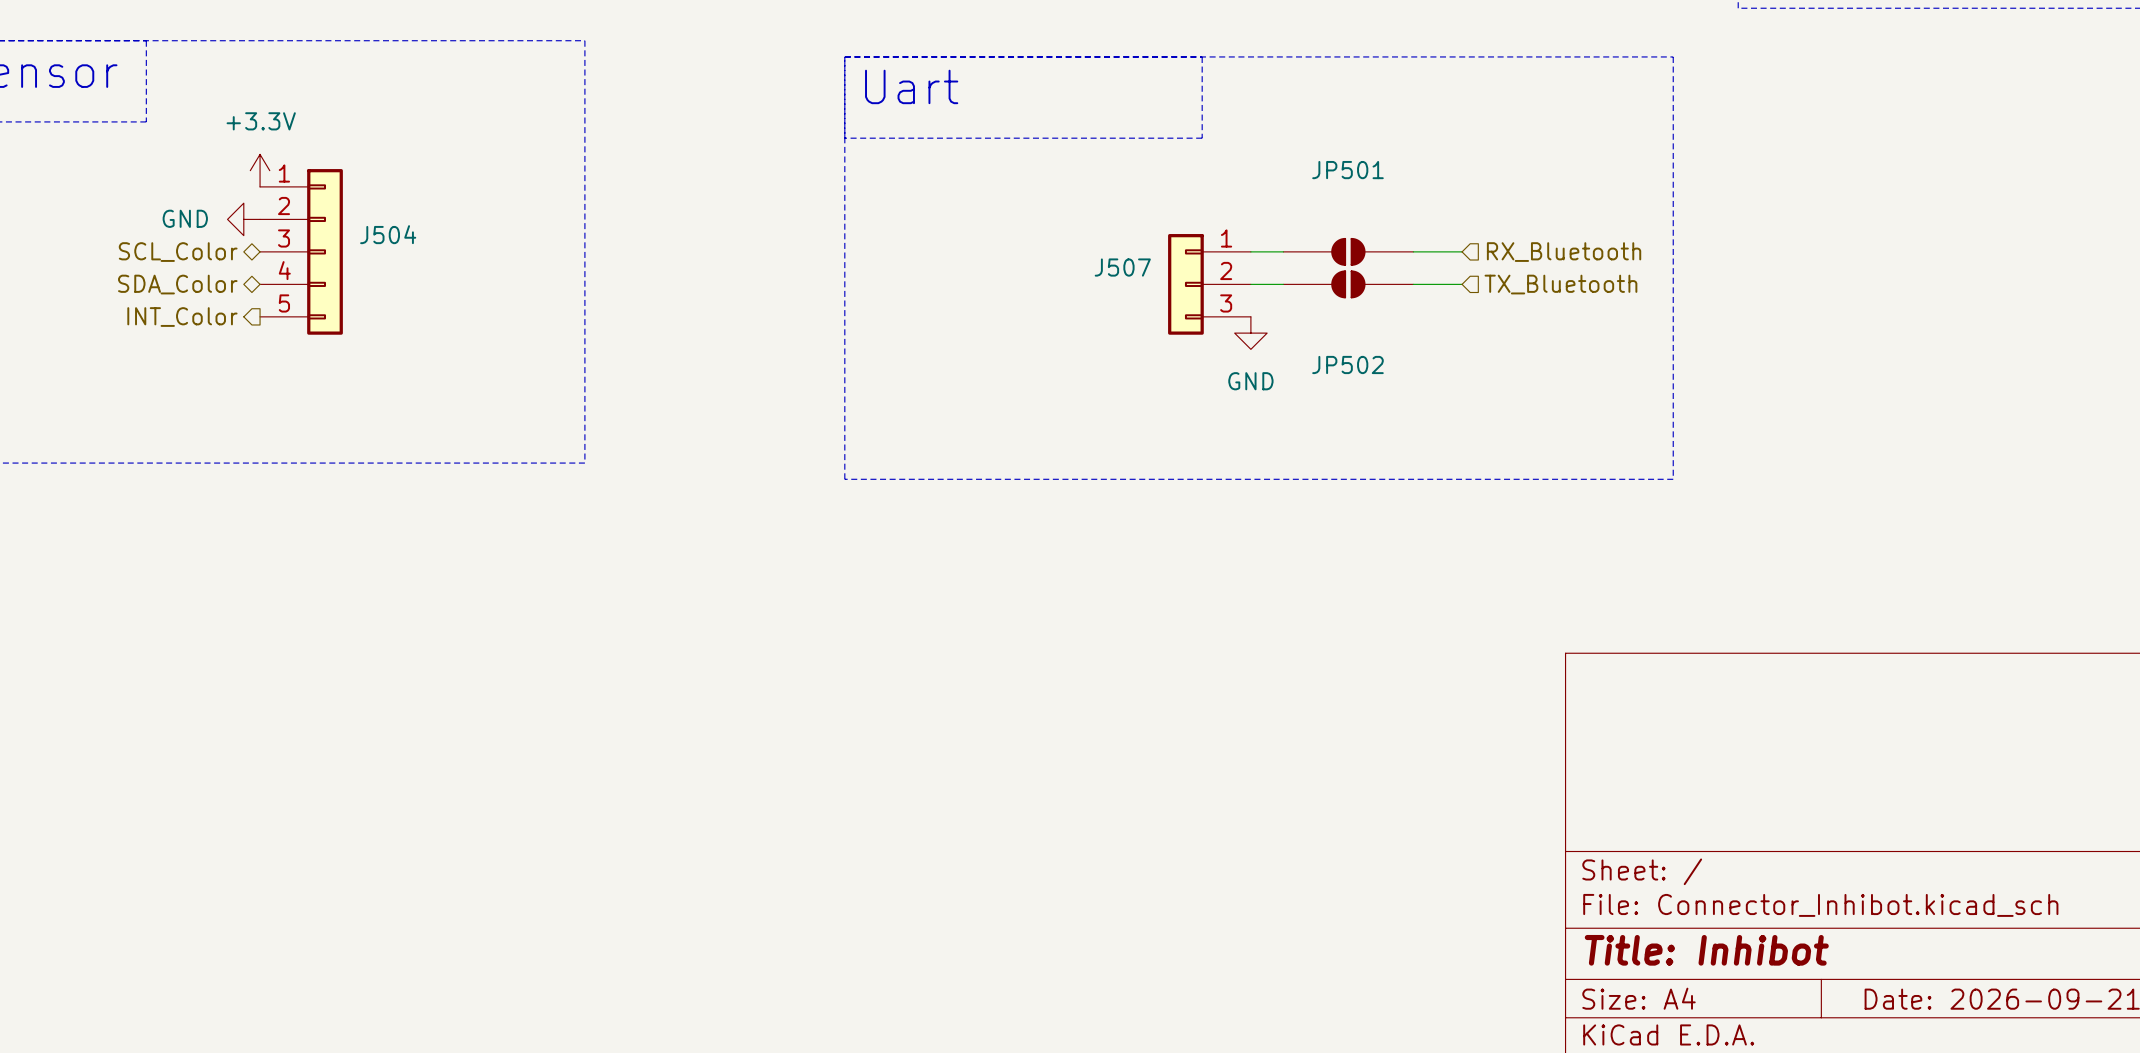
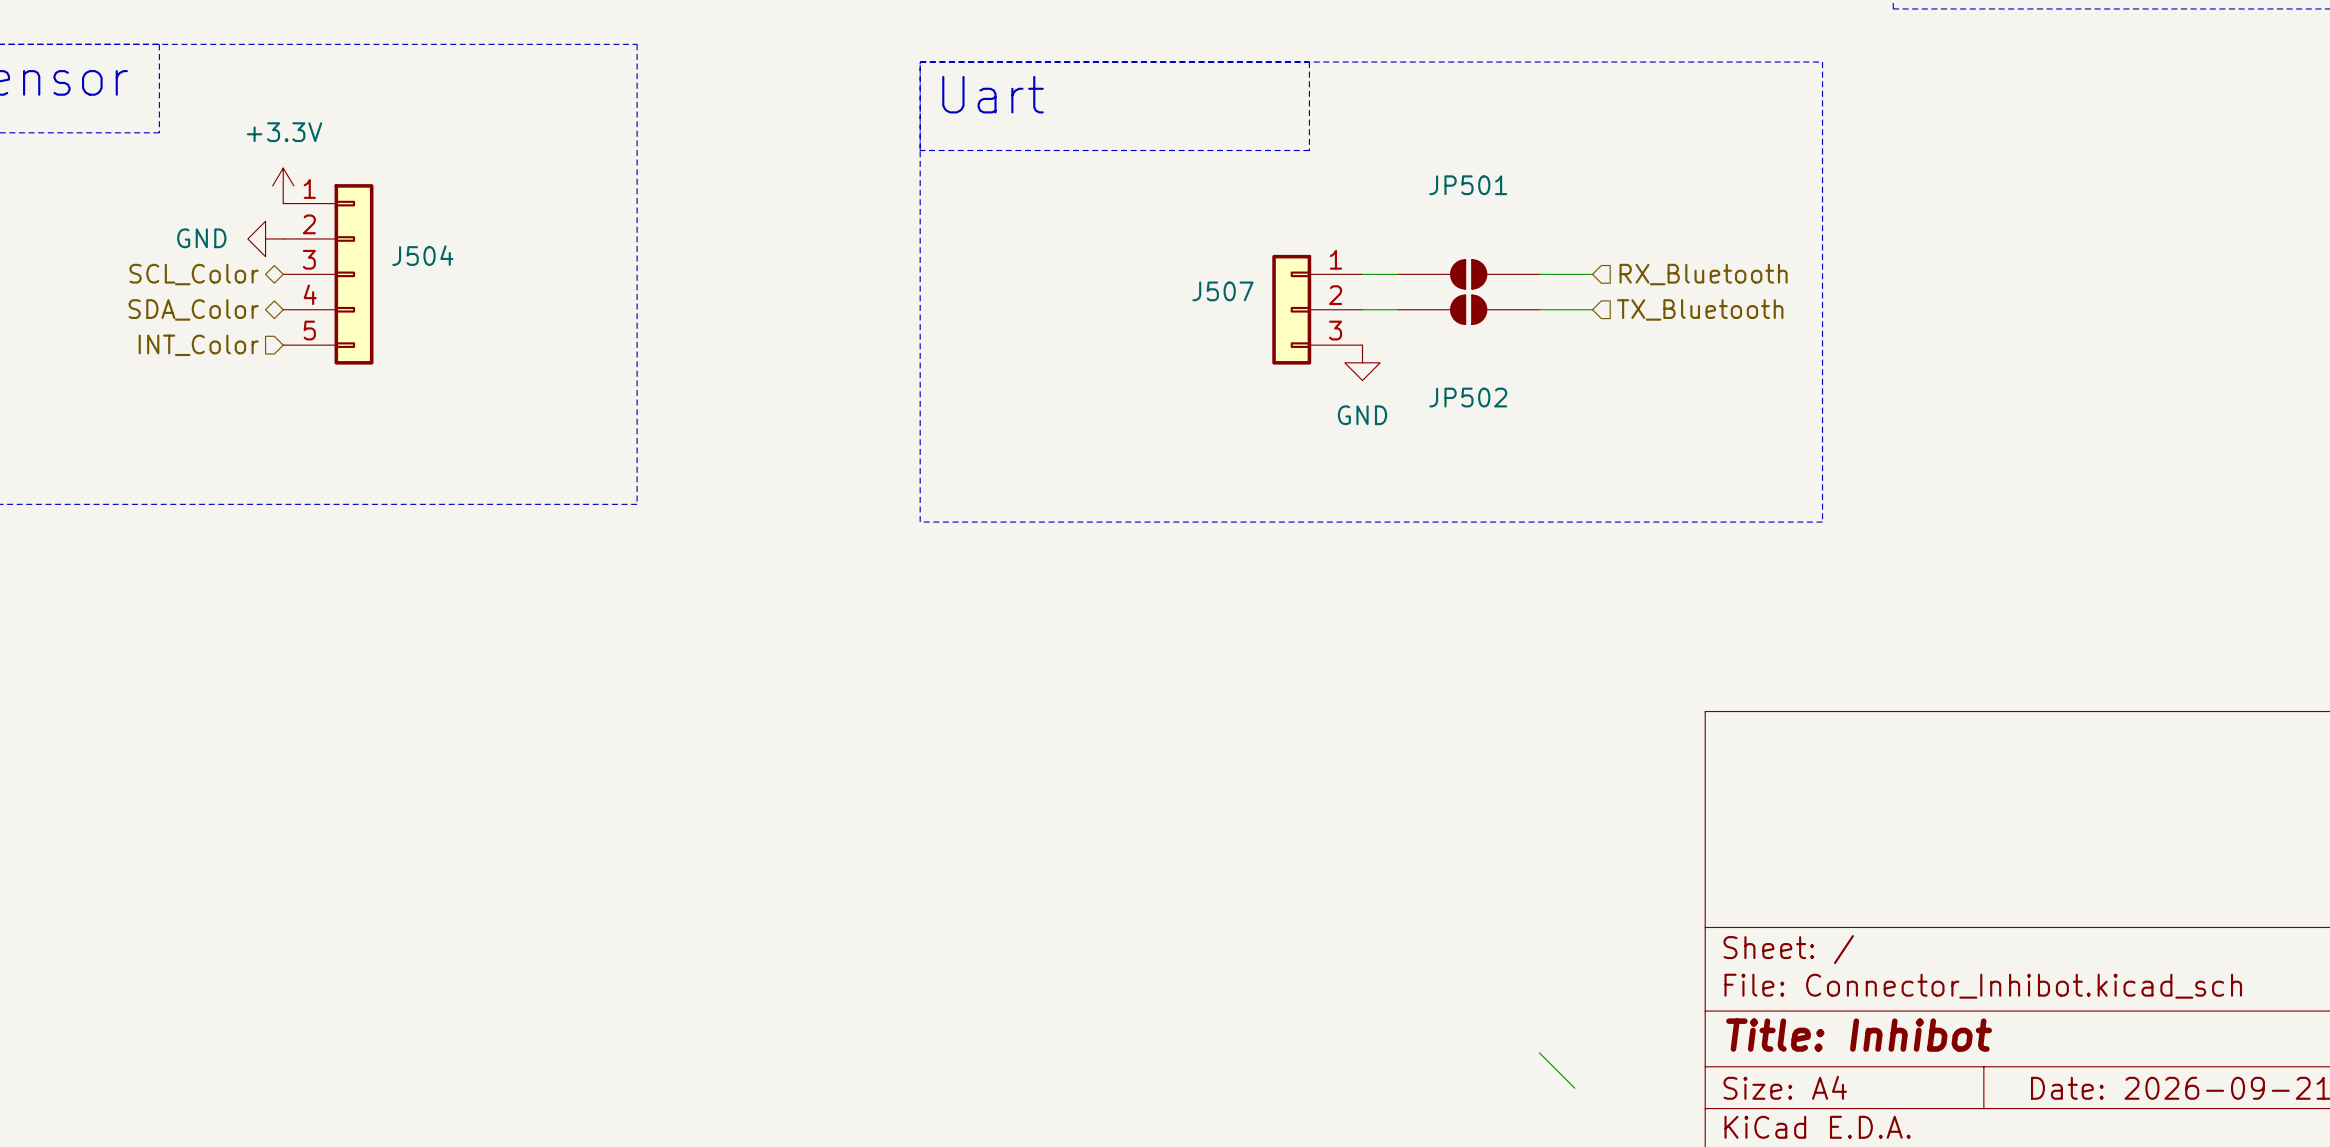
hierarchical label shape: output (182, 317) -> input (198, 345)
wire: none -> (1539, 1052) (1574, 1088)

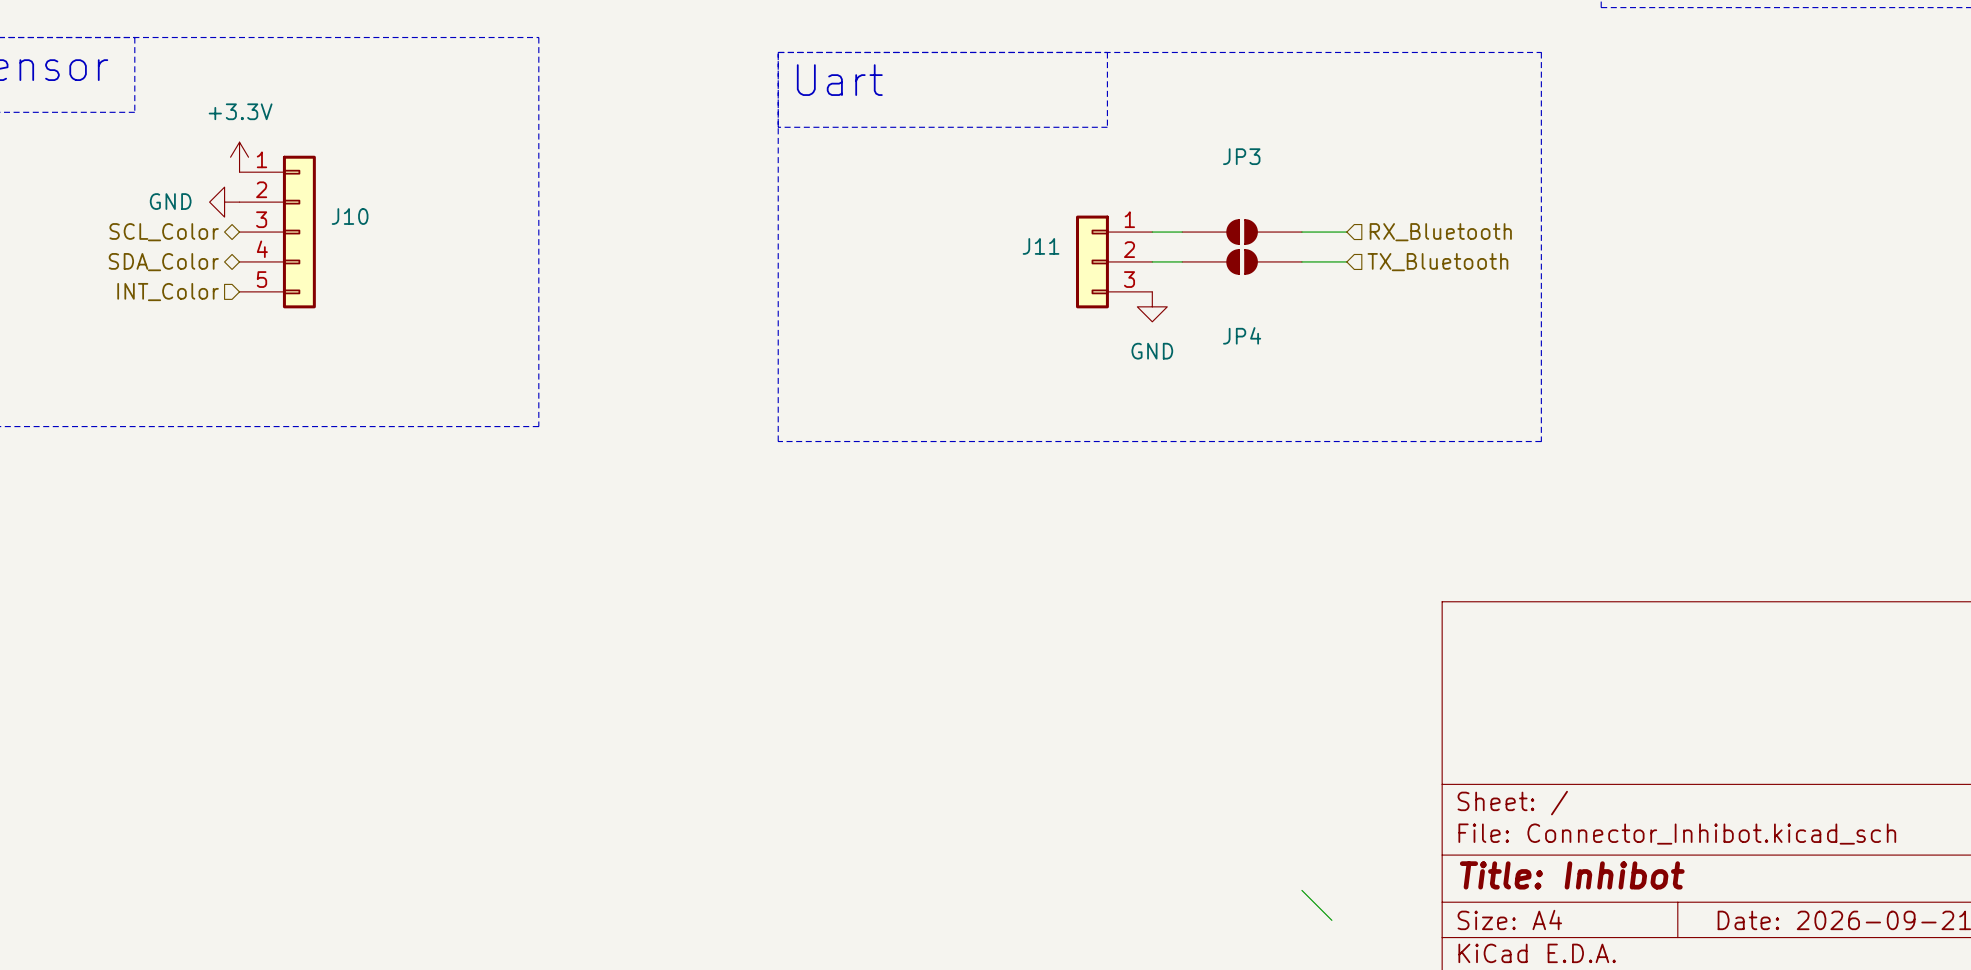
JP501 name: JP501 (1468, 185) -> JP3 (1241, 156)
J504 name: J504 (422, 255) -> J10 (350, 216)
J507 name: J507 (1222, 291) -> J11 (1041, 246)
JP502 name: JP502 (1468, 397) -> JP4 (1242, 335)

